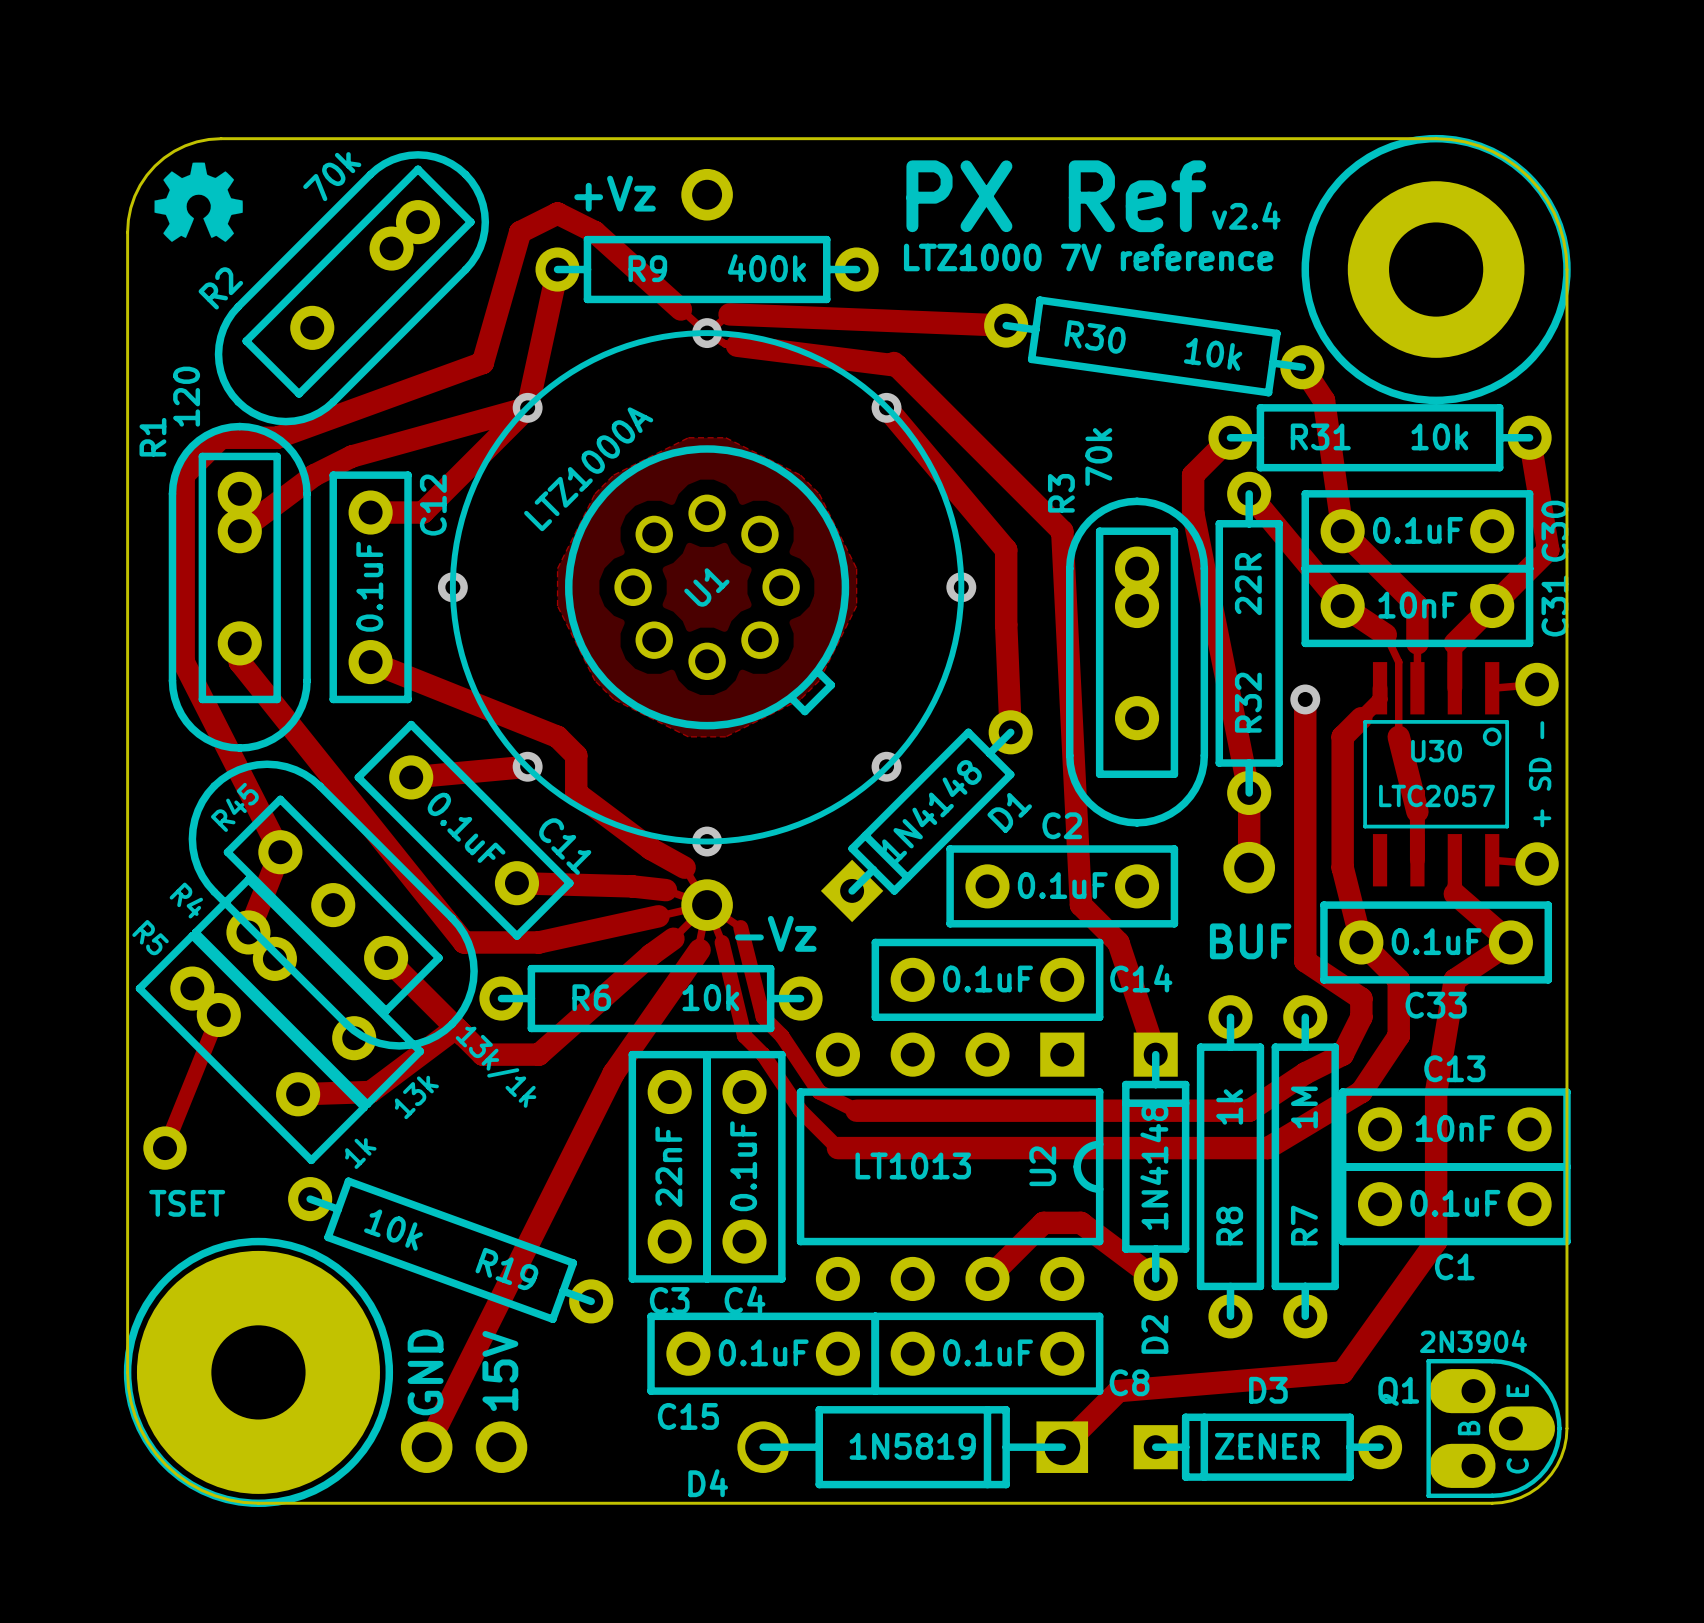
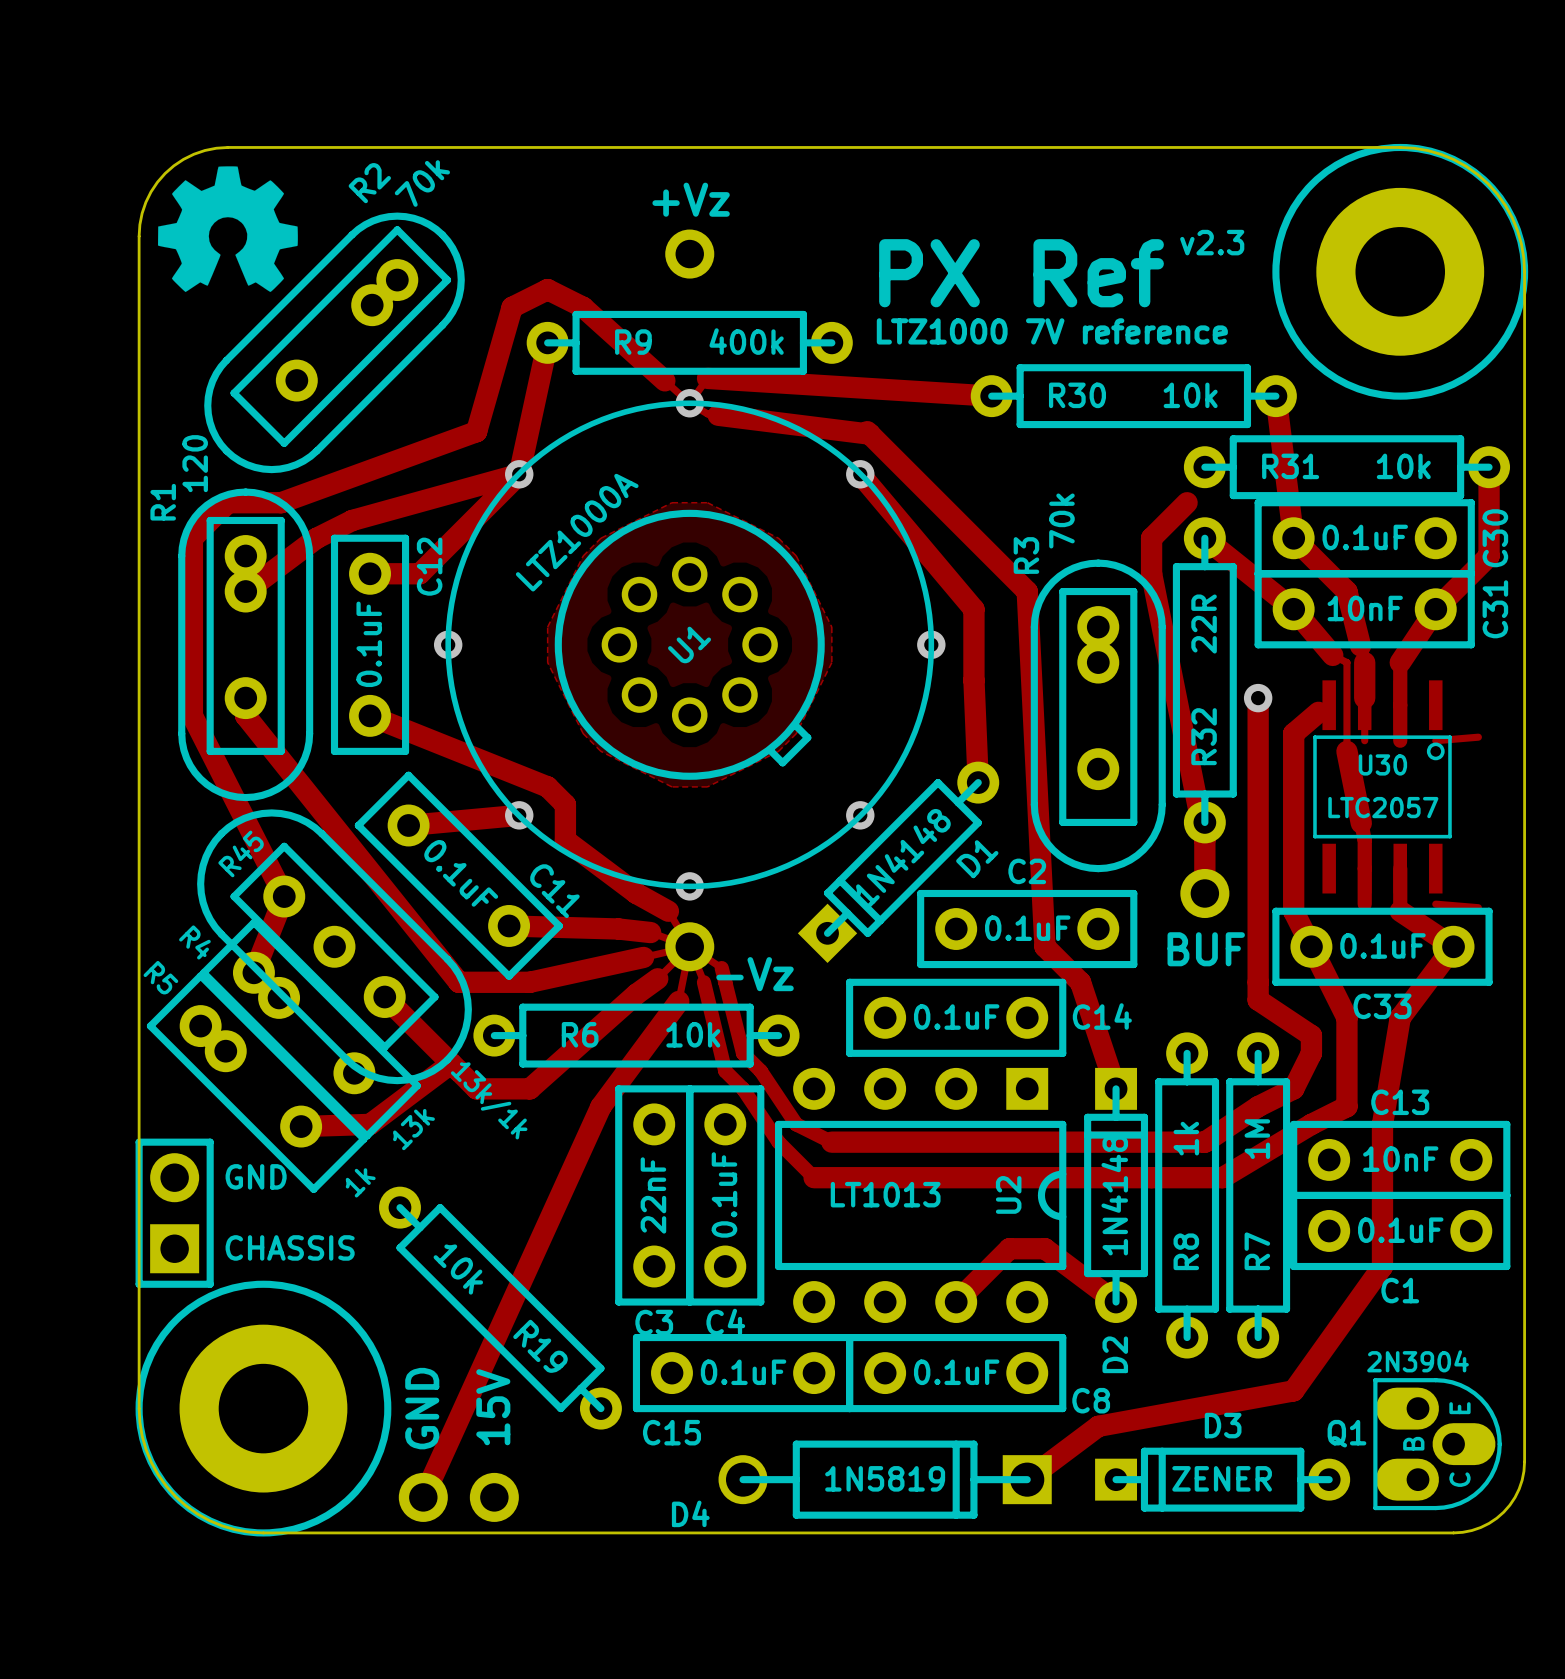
drawing: none -> [157, 166, 298, 293]
drawing: [154, 162, 243, 242] -> none
text: none -> v2.3 (1212, 242)
R2 value position: 70k (332, 176) -> 70k (422, 183)
text position: +Vz (615, 193) -> +Vz (691, 199)
part position: (707, 194) -> (689, 254)
text: v2.4 (1246, 215) -> none
board edge: (127, 232) (130, 207) (134, 196) (140, 185) (154, 166) (174, 151) (185, 145) (196, 141) (221, 138) (1436, 138) (1450, 139) (1479, 146) (1505, 158) (1528, 177) (1538, 187) (1554, 212) (1563, 240) (1566, 269) (1566, 1428) (1561, 1457) (1545, 1481) (1520, 1497) (1492, 1503) -> (139, 307) (139, 236) (142, 213) (145, 202) (157, 182) (173, 165) (193, 154) (216, 148) (1400, 147) (1427, 150) (1441, 154) (1466, 166) (1477, 174) (1497, 194) (1512, 217) (1521, 244) (1524, 271) (1524, 1461) (1519, 1489) (1503, 1512) (1480, 1527) (1453, 1532) (263, 1532) (235, 1529) (209, 1520) (185, 1505) (166, 1486) (151, 1462) (142, 1436) (139, 1390)
part position: (1436, 269) -> (1400, 271)
R2 name position: R2 (220, 288) -> R2 (369, 183)
R2 position: (351, 288) -> (334, 342)
track: (1006, 325) (729, 314) (707, 333) -> (991, 396) (707, 378) (689, 403)
R30 rotation: 0° (1154, 346) -> 8° counterclockwise (1133, 396)
track: (1302, 367) (1323, 400) (1342, 531) (1417, 606) -> (1275, 396) (1293, 538) (1346, 591) (1364, 662)
R31 position: (1380, 437) -> (1346, 467)
track: (1529, 437) (1548, 549) (1454, 643) -> (1489, 467) (1489, 556) (1435, 609) (1400, 662) (1400, 698)
track: (1249, 493) (1342, 606) (1385, 634) (1398, 662) -> (1204, 538) (1293, 609) (1332, 655) (1346, 662) (1346, 715)
C30 position: (1417, 531) -> (1364, 538)
C31 position: (1417, 606) -> (1364, 609)
R32 position: (1249, 643) -> (1204, 680)
track: none -> (1258, 698) (1258, 751)
part: (1537, 684) -> none
track: (1380, 688) (1380, 699) (1342, 736) -> (1329, 705) (1293, 733) (1293, 786)
via position: (1305, 699) -> (1258, 698)
track: (1398, 699) (1398, 736) (1417, 811) -> (1346, 751) (1364, 840)
U30 position: (1436, 774) -> (1382, 786)
text: + SD - (1540, 774) -> none
part: (1537, 863) -> none
part position: (1249, 867) -> (1204, 893)
track: (1342, 867) (1361, 942) (1398, 979) -> (1293, 911) (1346, 1017)
track: (1454, 886) (1454, 893) (1510, 942) (1454, 979) -> (1400, 868) (1400, 911) (1453, 946) (1400, 1017)
track: (699, 941) (699, 949) (613, 1073) (426, 1447) -> (682, 980) (678, 1001) (600, 1106) (423, 1497)
text position: BUF (1250, 941) -> BUF (1206, 949)
C33 position: (1436, 942) -> (1382, 946)
track: (218, 1014) (164, 1148) -> none
track: (1398, 1035) (1361, 1092) -> (1346, 1071) (1346, 1106) (1311, 1124)
text: none -> GND (256, 1176)
part: (164, 1148) -> none
R19 footprint: [288, 1177, 614, 1324] -> [379, 1186, 622, 1430]
part: none -> (174, 1213)
text: TSET (187, 1203) -> none
text: none -> CHASSIS (290, 1247)
part footprint: [123, 1237, 394, 1508] -> [135, 1280, 392, 1537]
text position: 15V (500, 1370) -> 15V (493, 1407)
board edge: (127, 1372) (128, 1387) (134, 1415) (147, 1442) (156, 1454) (176, 1474) (188, 1483) (215, 1495) (243, 1502) (1492, 1503) -> none
text position: GND (425, 1372) -> GND (422, 1408)
track: (1342, 1372) (1118, 1391) (1062, 1447) -> (1293, 1390) (1098, 1426) (1027, 1479)
Q1 name position: Q1 (1398, 1391) -> Q1 (1346, 1433)
part position: (426, 1447) -> (423, 1497)
part position: (501, 1447) -> (494, 1497)
D4 position: (912, 1447) -> (885, 1479)
D3 position: (1267, 1447) -> (1222, 1479)

